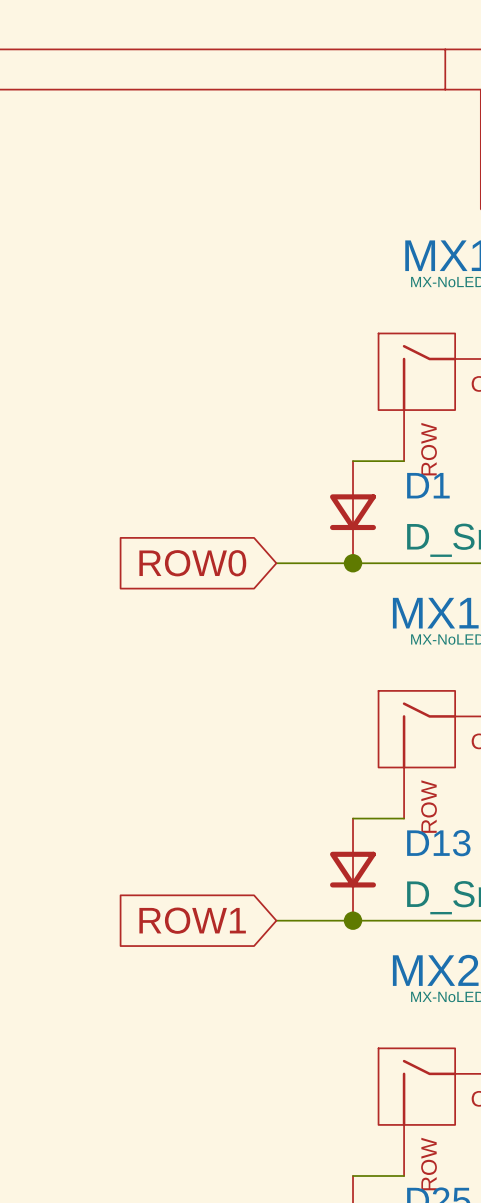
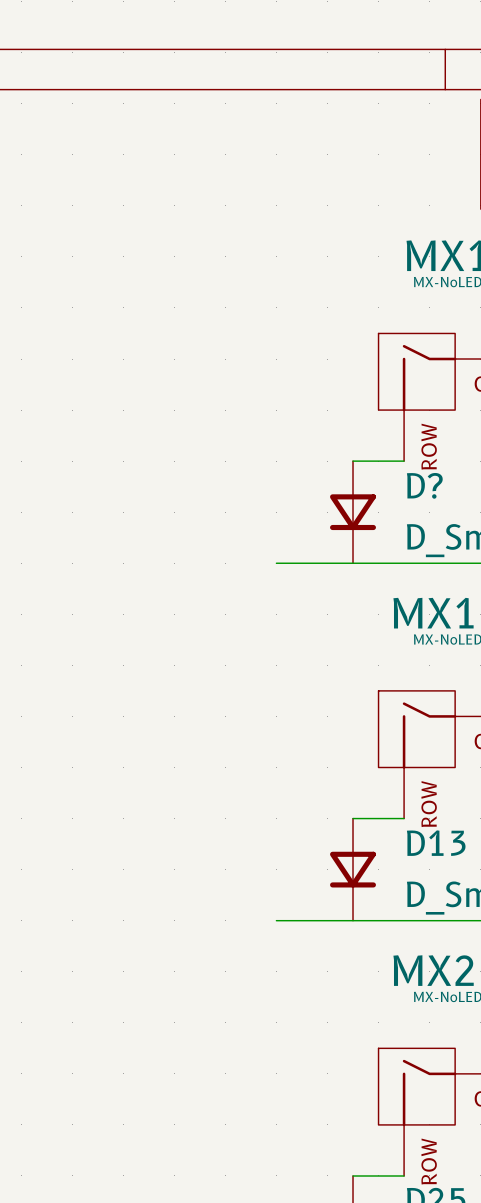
D1 name: D1 (428, 485) -> D? (424, 485)
global label: ROW0 (192, 563) -> none
junction: (353, 563) -> none
global label: ROW1 (192, 920) -> none
junction: (353, 920) -> none

